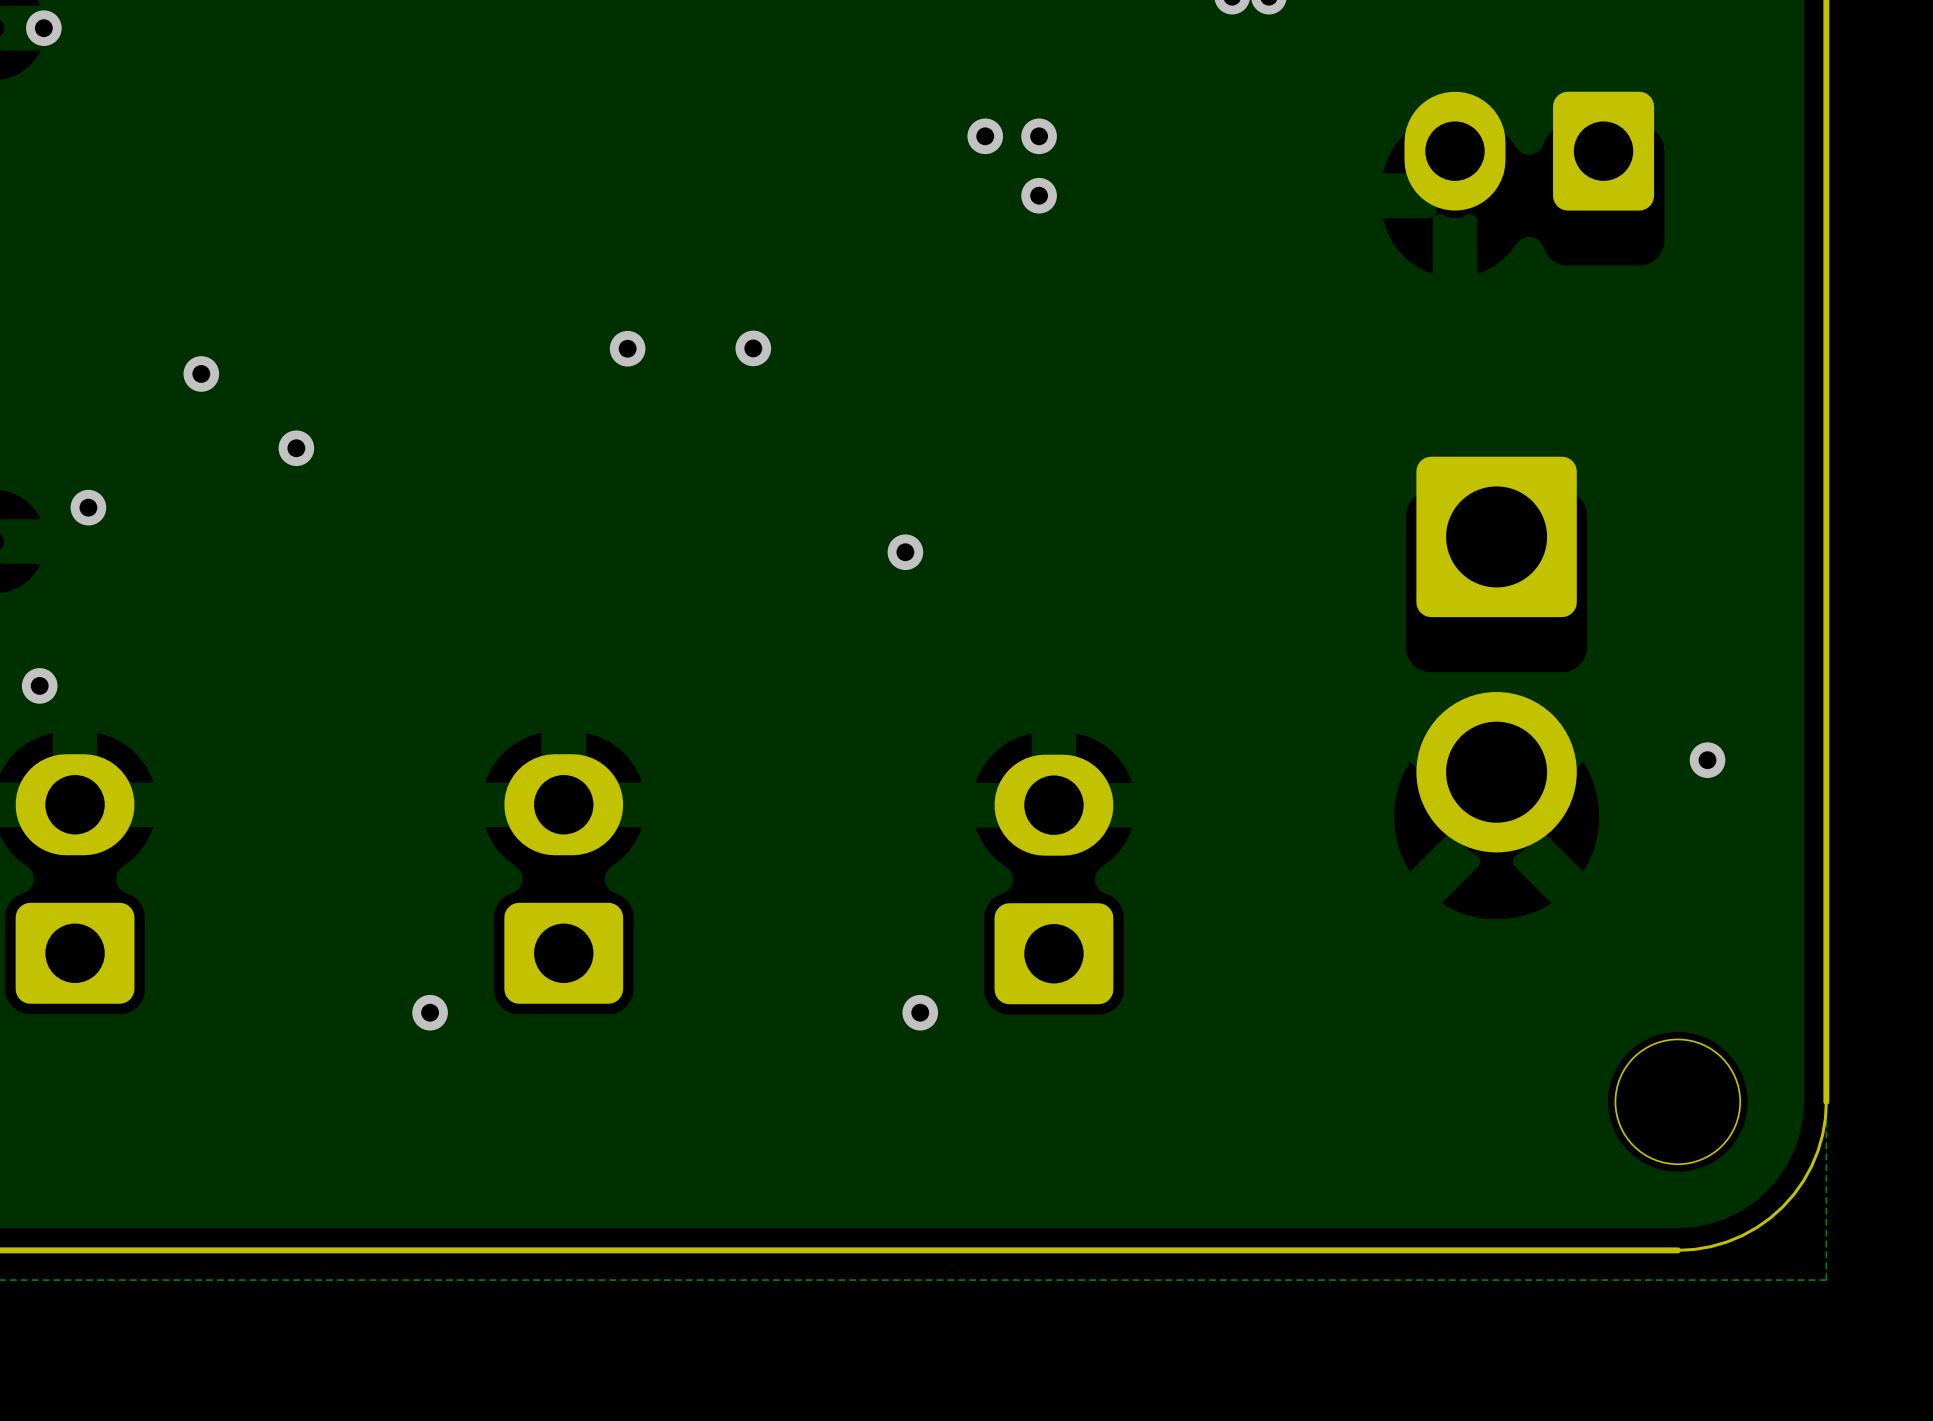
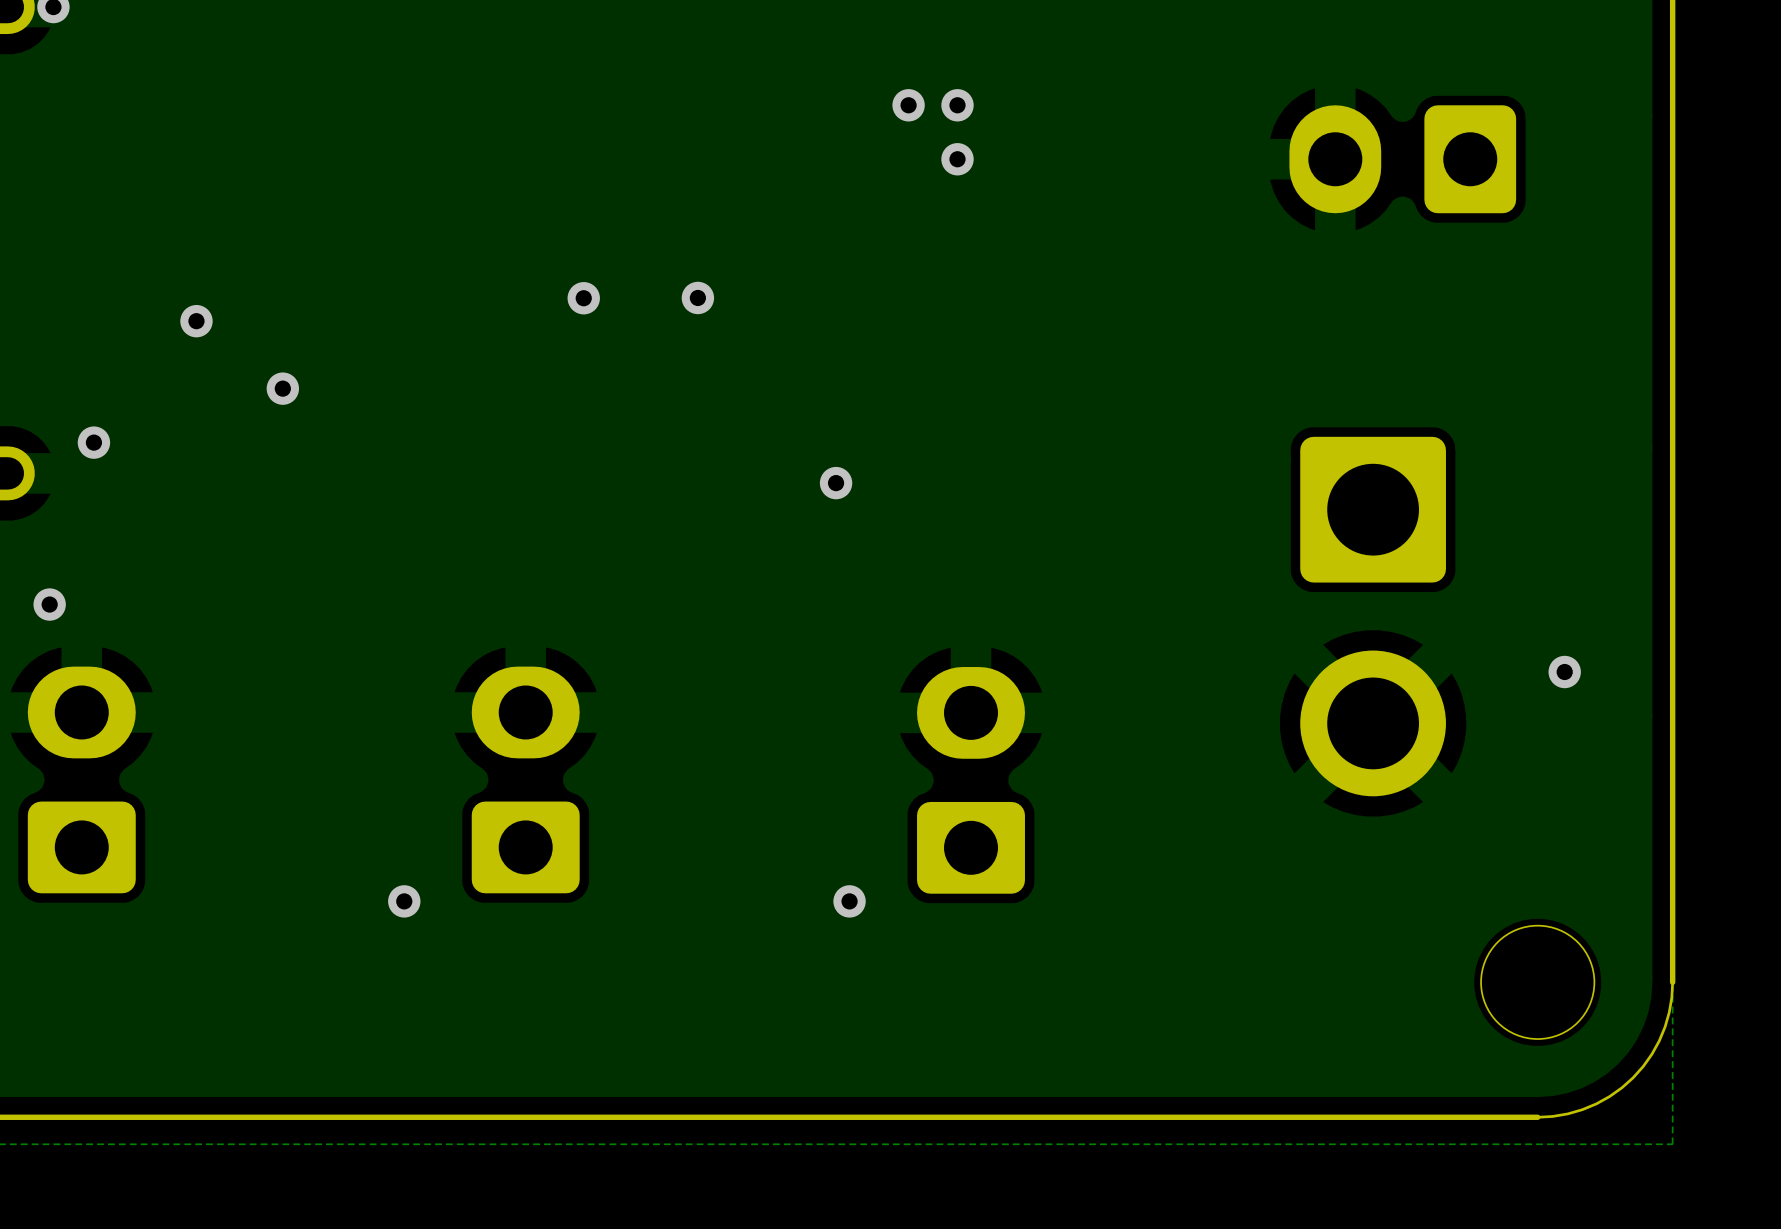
part position: (1529, 151) -> (1402, 159)
part position: (1496, 654) -> (1373, 616)

